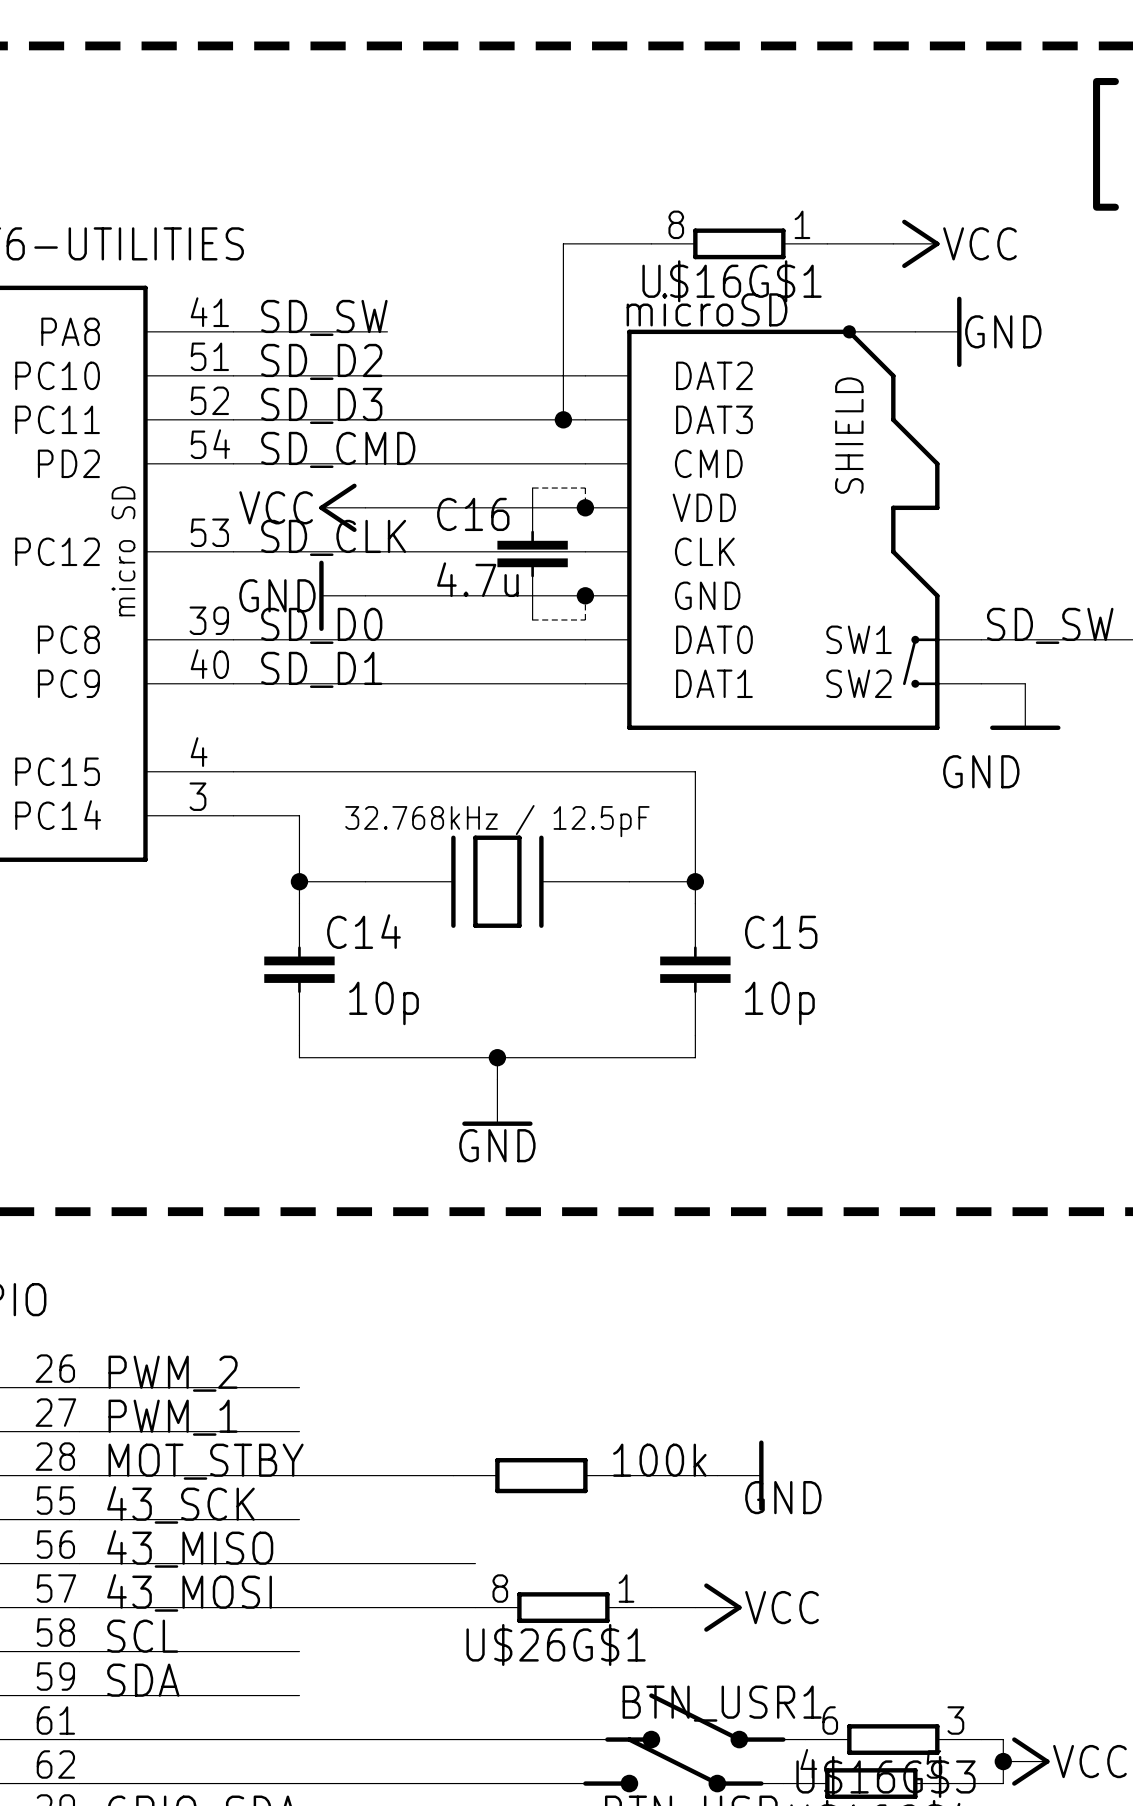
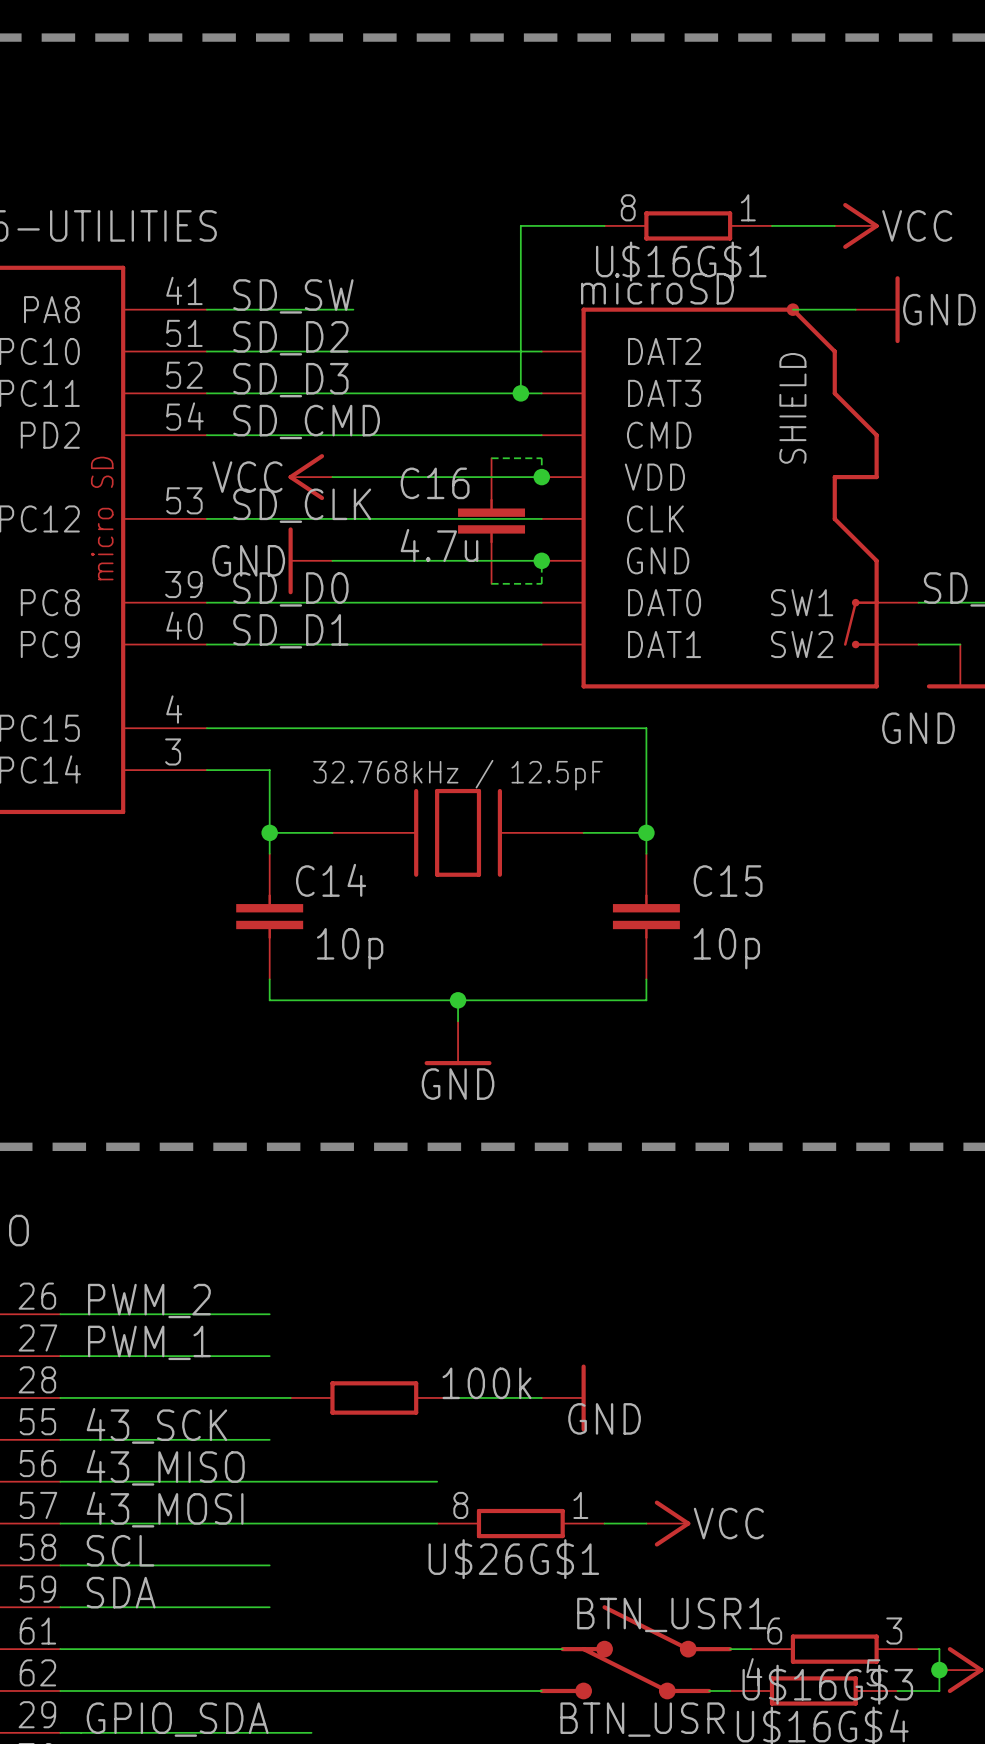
label: MOT_STBY (206, 1461) -> none
wire: (321, 1475) (453, 1475) -> none
part position: (541, 1475) -> (374, 1397)
wire: (629, 1475) (717, 1475) -> (458, 1397) (541, 1397)
power symbol position: GND (740, 1475) -> GND (563, 1397)

